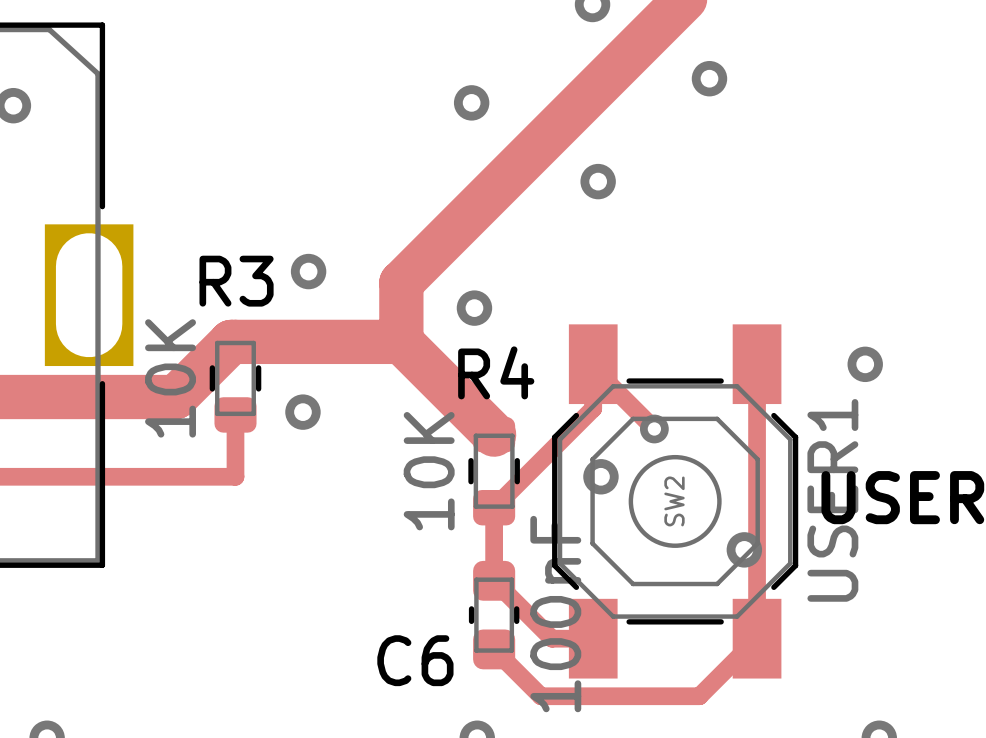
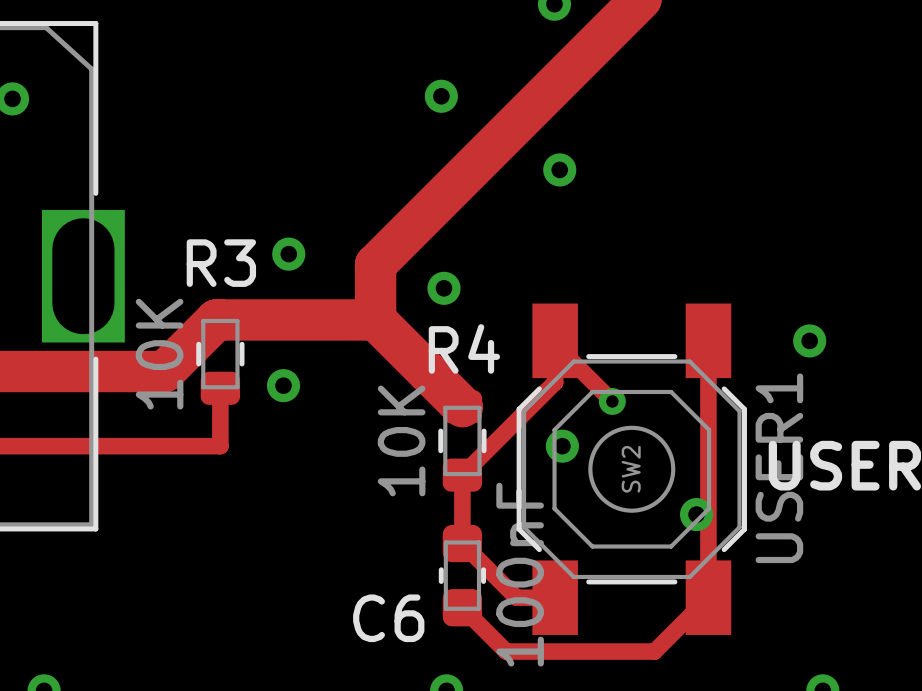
via: (709, 78) -> none

